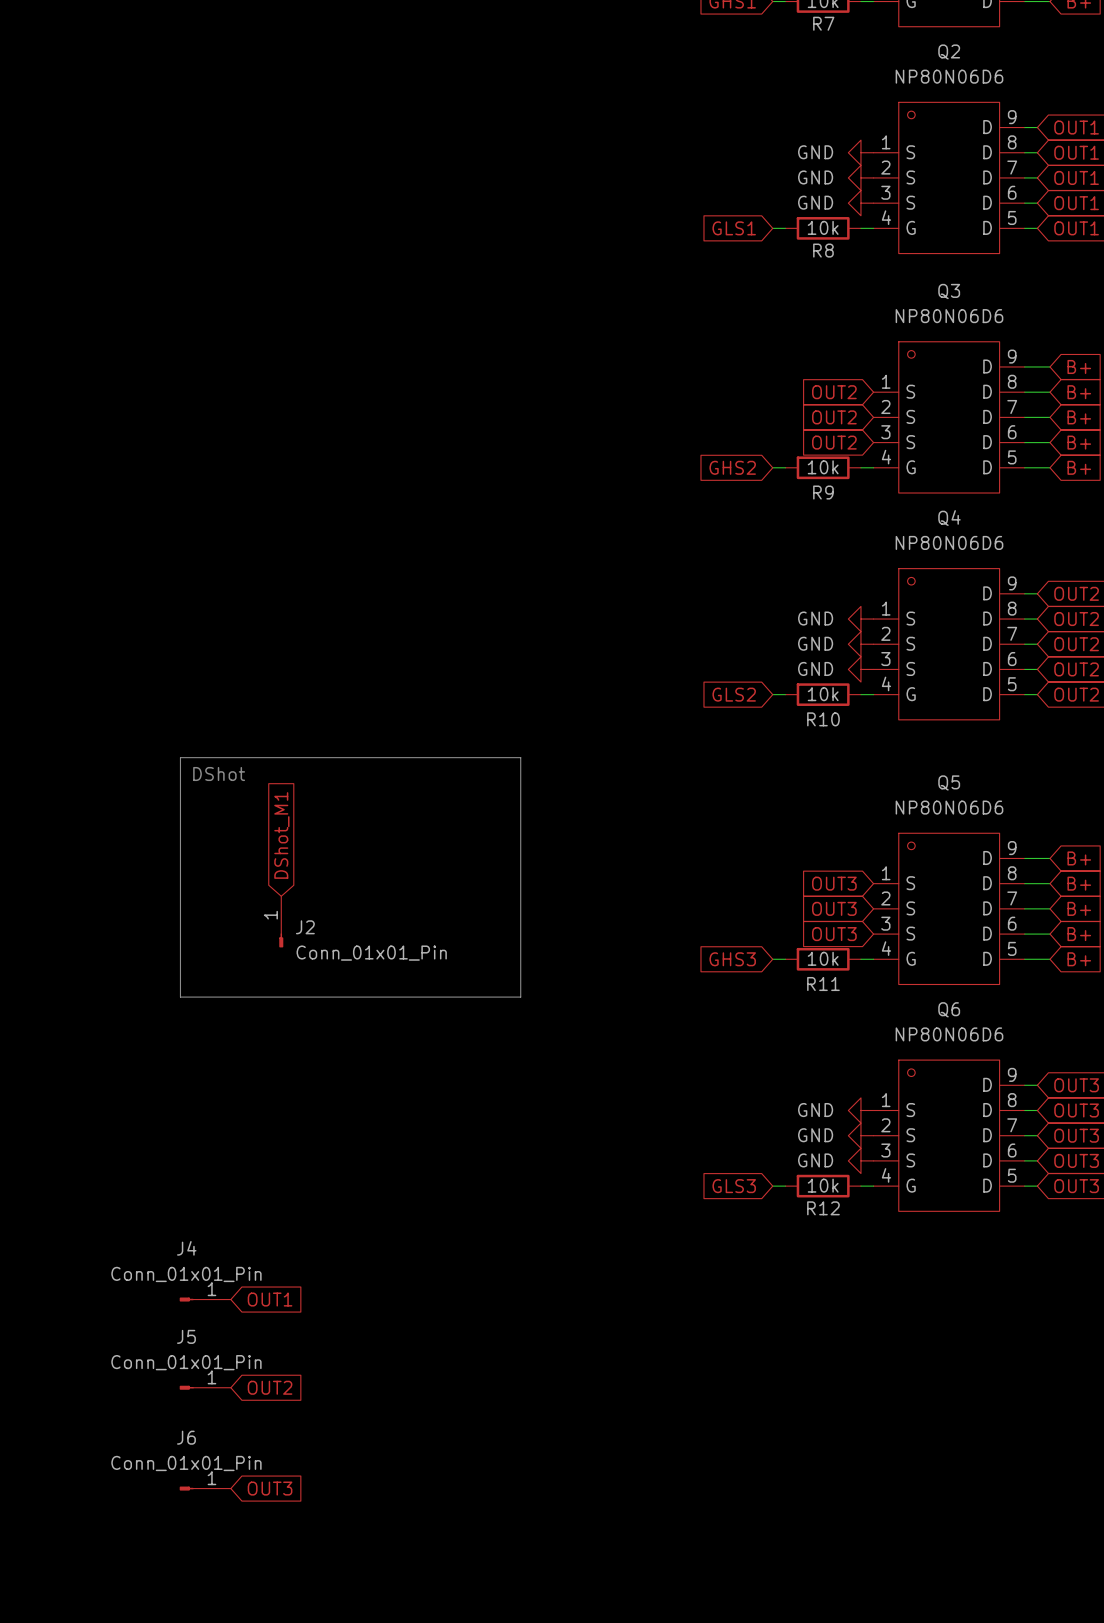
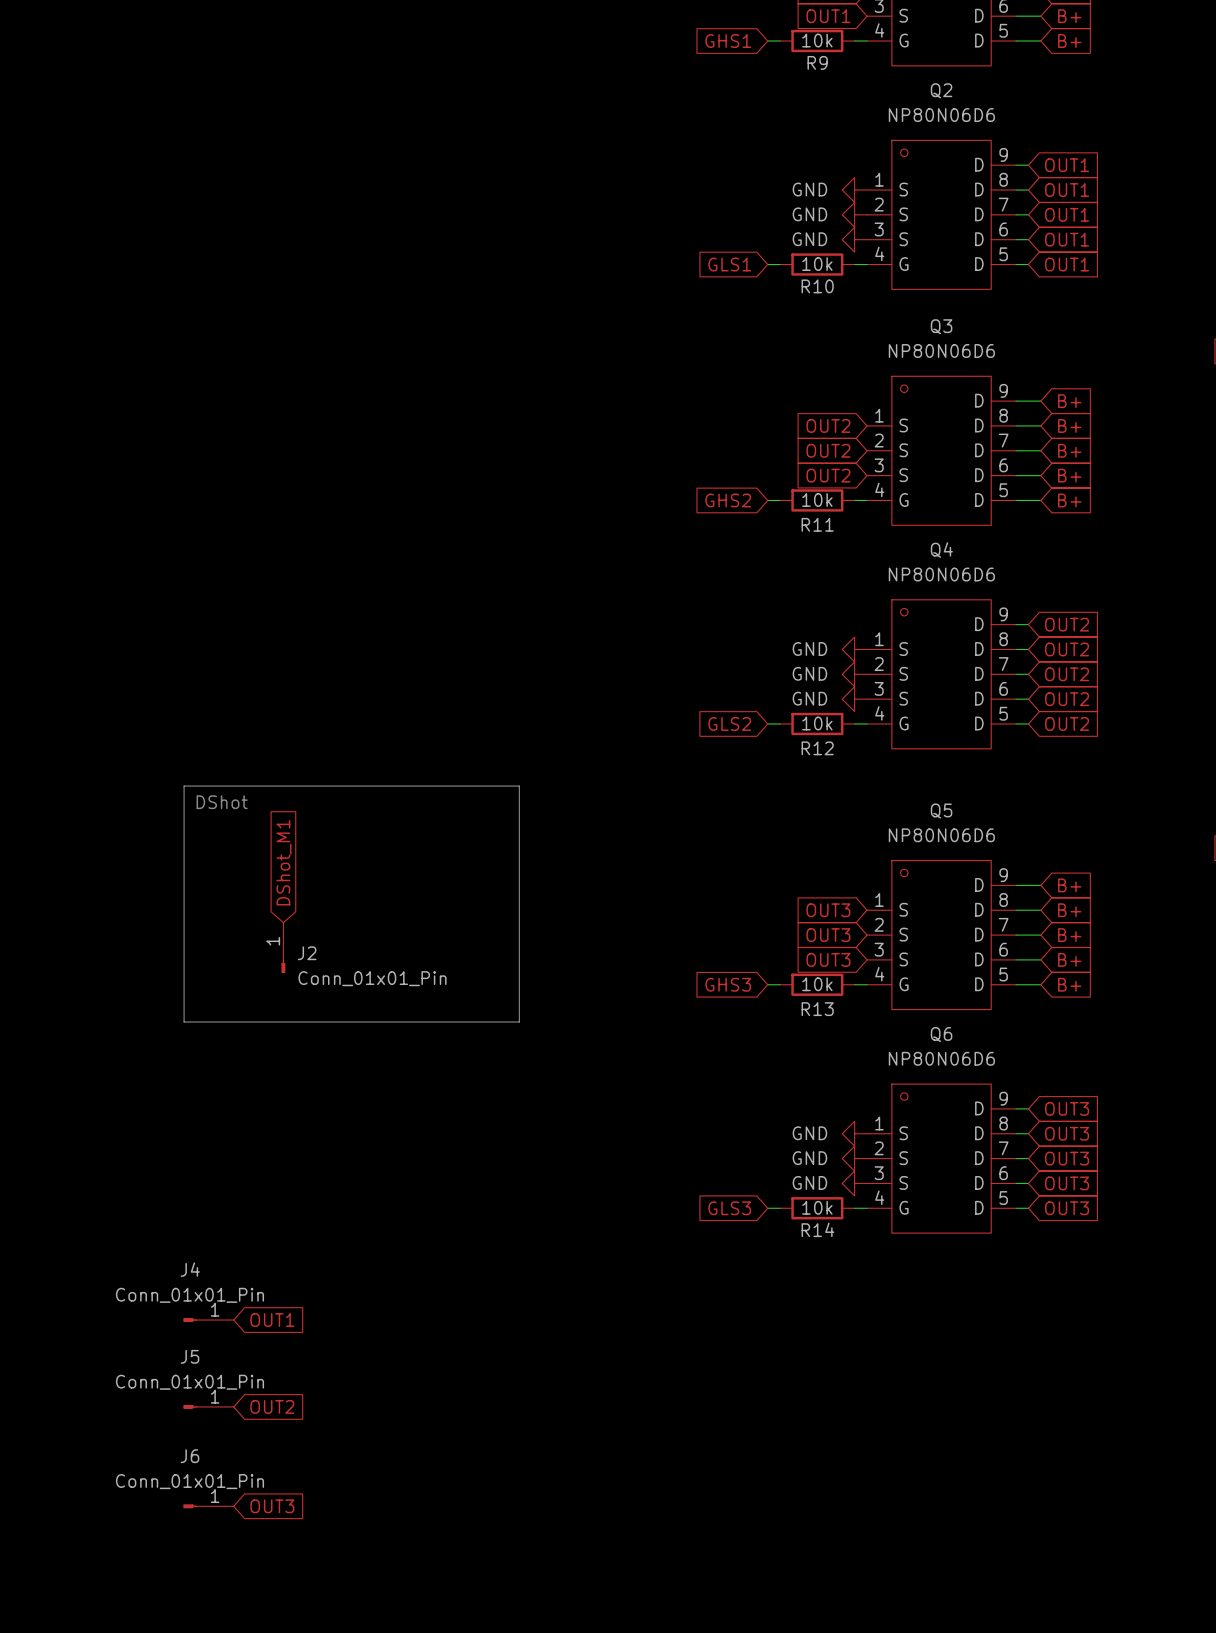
R7 name: R7 (823, 23) -> R9 (817, 62)
R8 name: R8 (823, 250) -> R10 (817, 286)
R9 name: R9 (823, 492) -> R11 (817, 524)
R10 name: R10 (823, 719) -> R12 (817, 748)
R11 name: R11 (823, 984) -> R13 (817, 1009)
R12 name: R12 (823, 1208) -> R14 (817, 1229)

